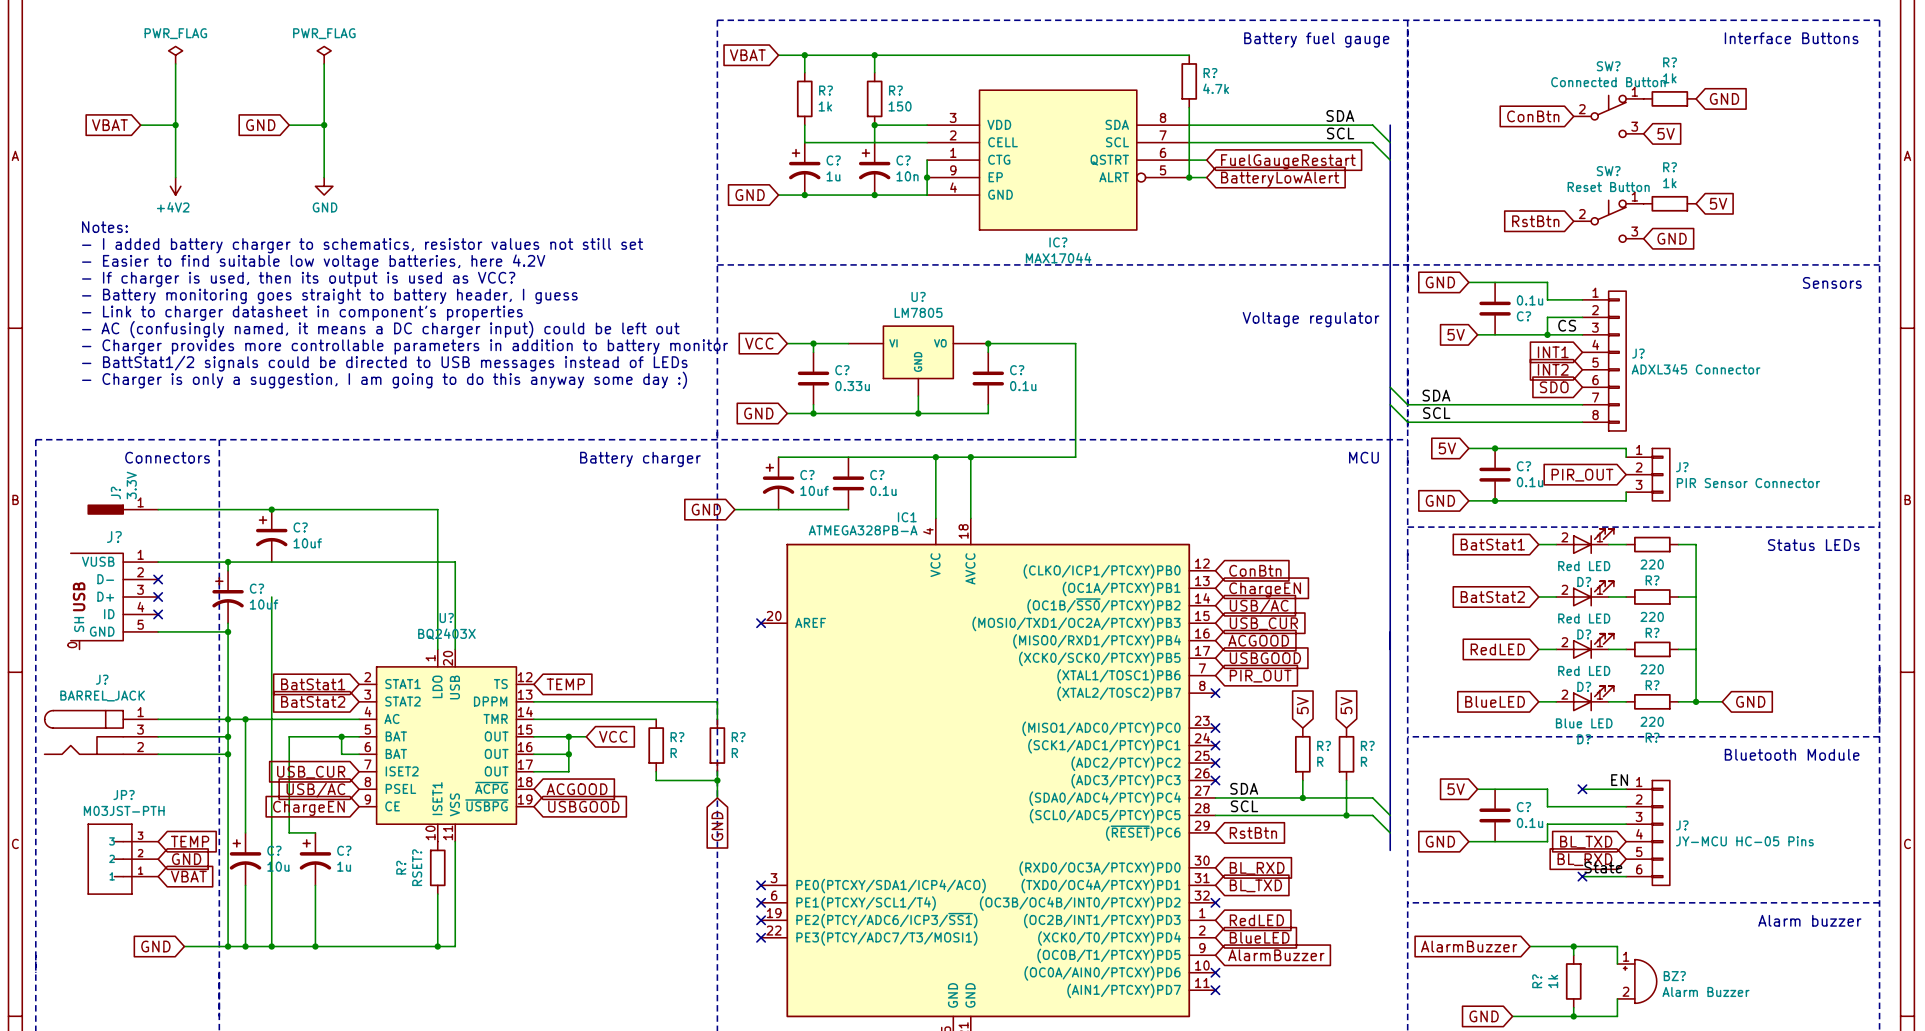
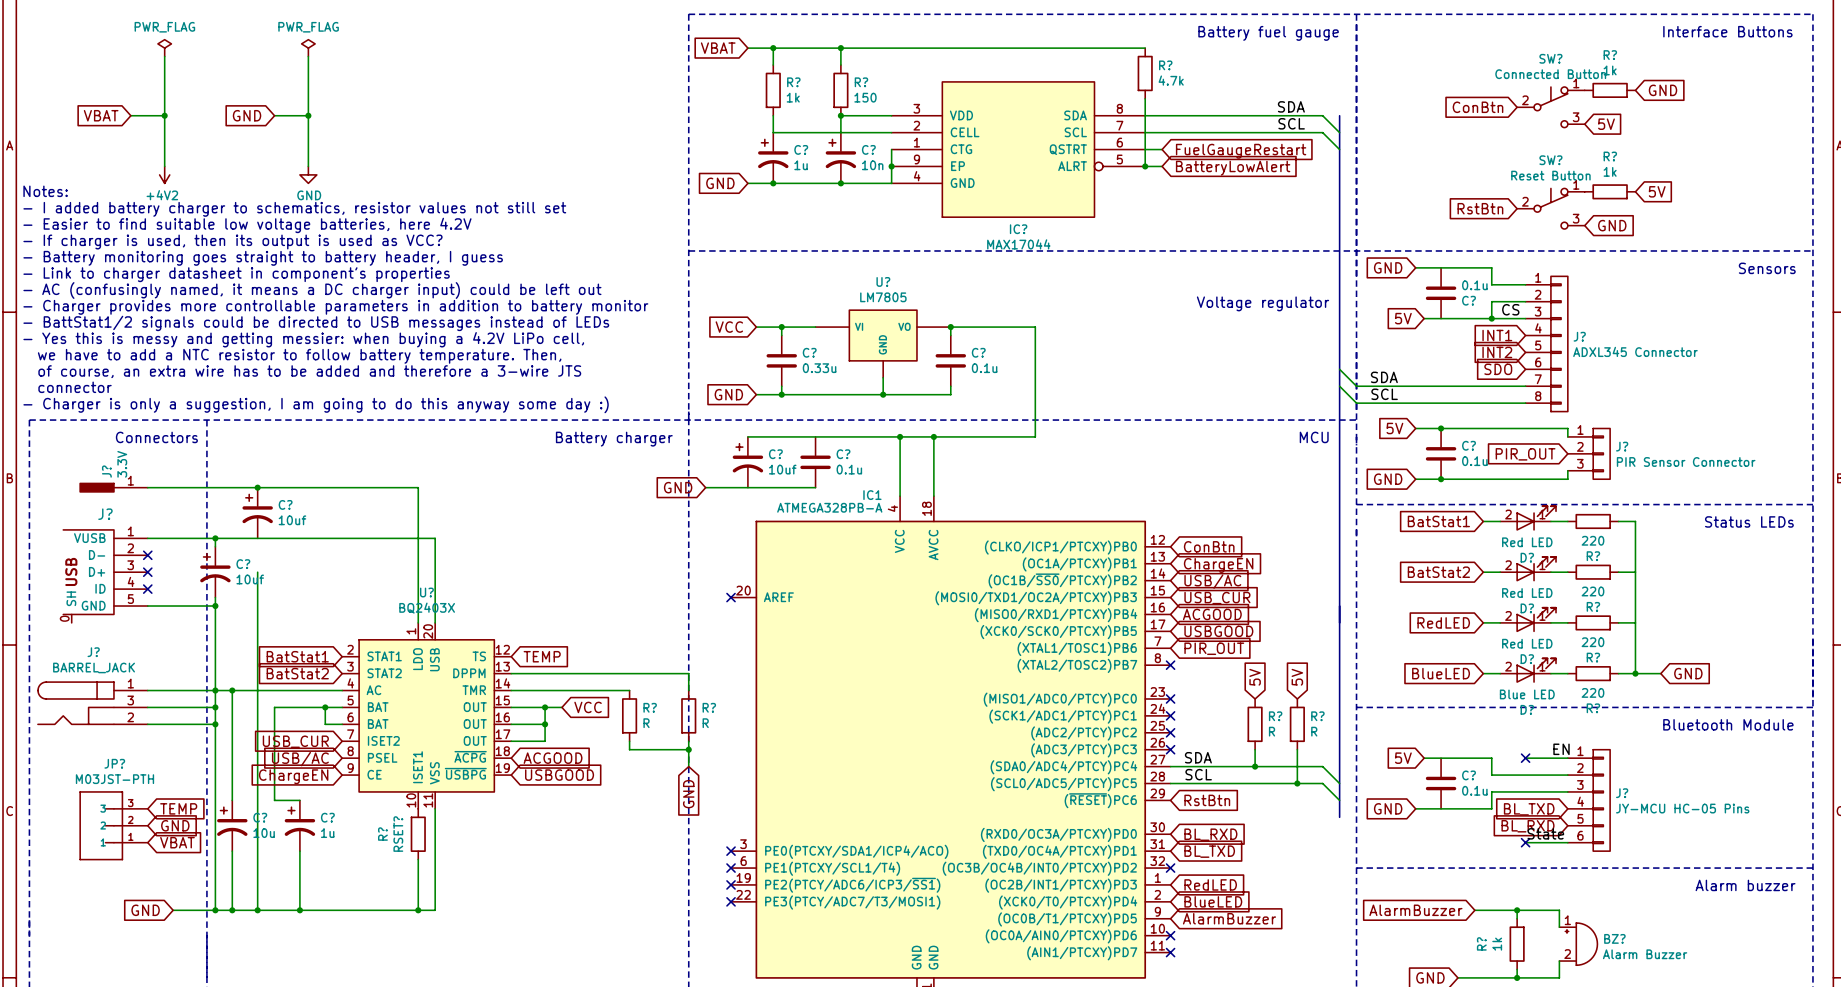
text position: Notes: (104, 227) -> Notes: (45, 191)
text position: - I added battery charger to schematics, resistor values not still set (362, 245) -> - I added battery charger to schematics, resistor values not still set (294, 209)
text position: - Easier to find suitable low voltage batteries, here 4.2V (313, 262) -> - Easier to find suitable low voltage batteries, here 4.2V (247, 225)
text position: - If charger is used, then its output is used as VCC? (298, 279) -> - If charger is used, then its output is used as VCC? (232, 242)
text position: - Battery monitoring goes straight to battery header, I guess (329, 296) -> - Battery monitoring goes straight to battery header, I guess (263, 258)
text position: - Link to charger datasheet in component's properties (302, 313) -> - Link to charger datasheet in component's properties (236, 274)
text position: - AC (confusingly named, it means a DC charger input) could be left out (380, 329) -> - AC (confusingly named, it means a DC charger input) could be left out (312, 290)
text position: - Charger provides more controllable parameters in addition to battery monitor (405, 347) -> - Charger provides more controllable parameters in addition to battery monitor (335, 307)
text: none -> - Yes this is messy and getting messier: when buying a 4.2V LiPo cell, (303, 339)
text position: - BattStat1/2 signals could be directed to USB messages instead of LEDs (384, 363) -> - BattStat1/2 signals could be directed to USB messages instead of LEDs (316, 323)
text: none -> we have to add a NTC resistor to follow battery temperature. Then, (299, 356)
text position: - Charger is only a suggestion, I am going to do this anyway some day :) (384, 380) -> - Charger is only a suggestion, I am going to do this anyway some day :) (316, 404)
text: none -> of course, an extra wire has to be added and therefore a 3-wire JTS (309, 371)
text: none -> connector (75, 387)

